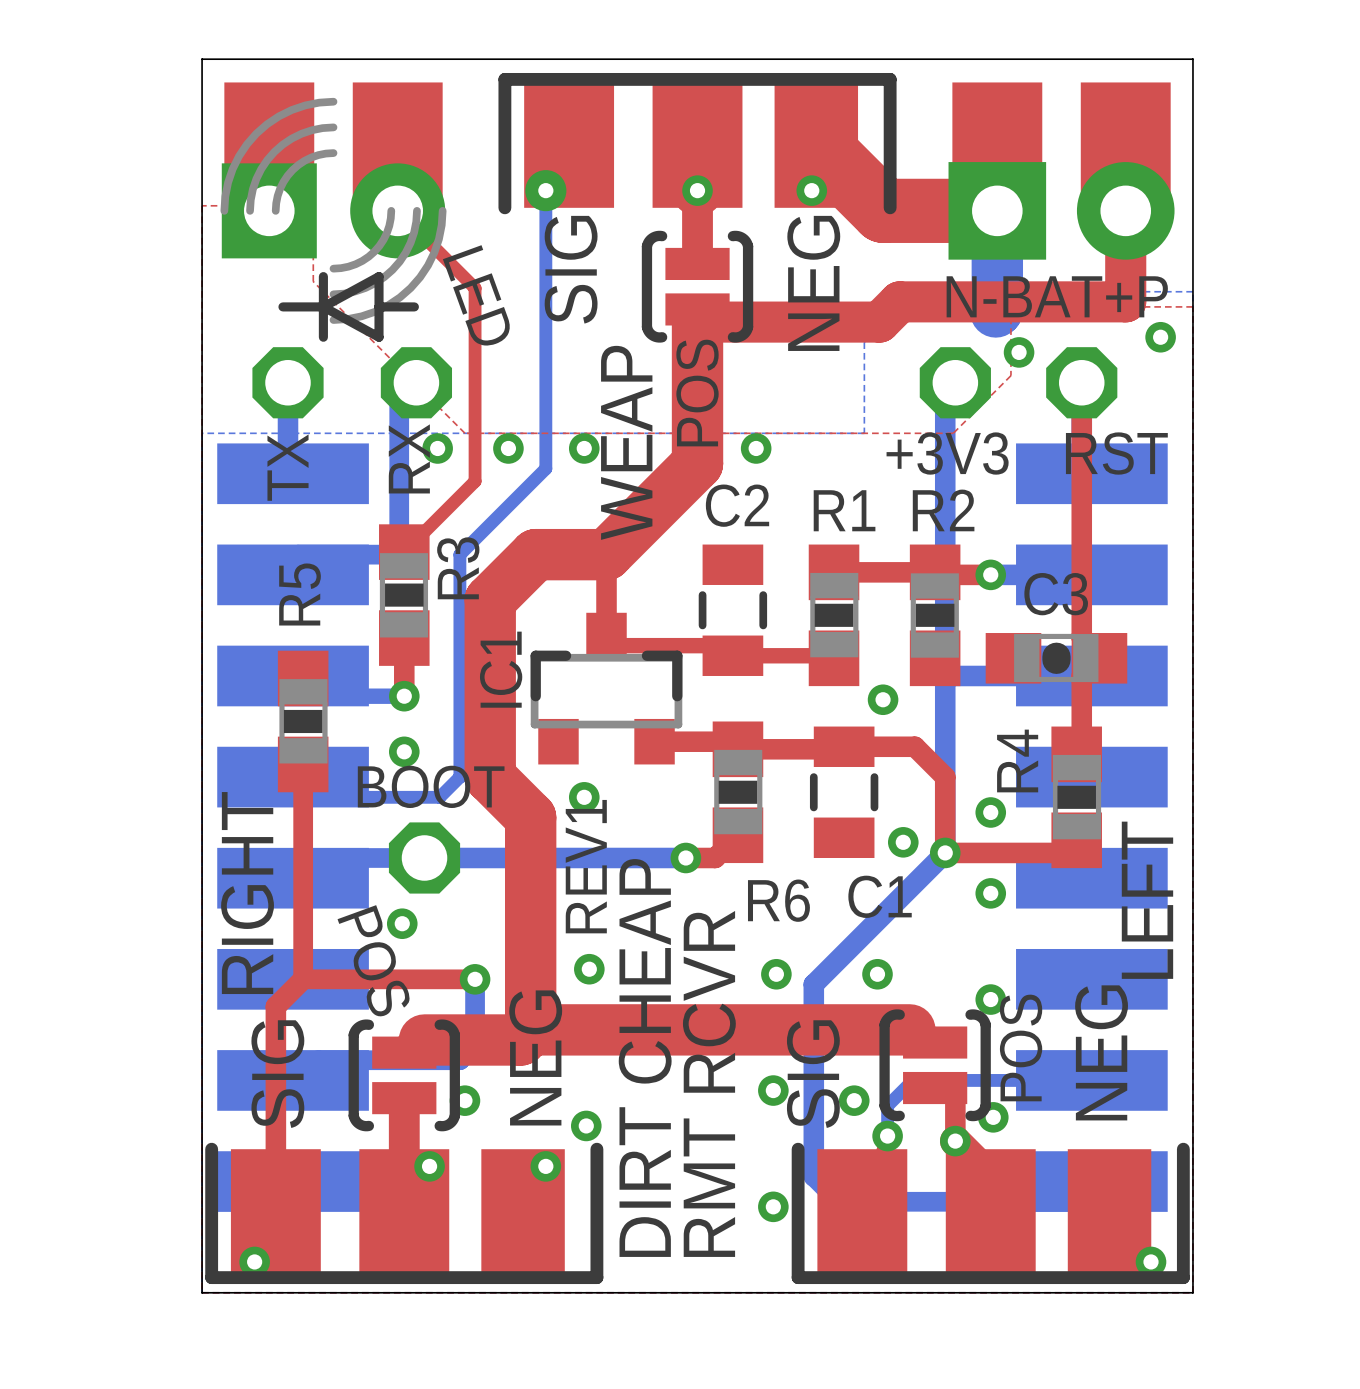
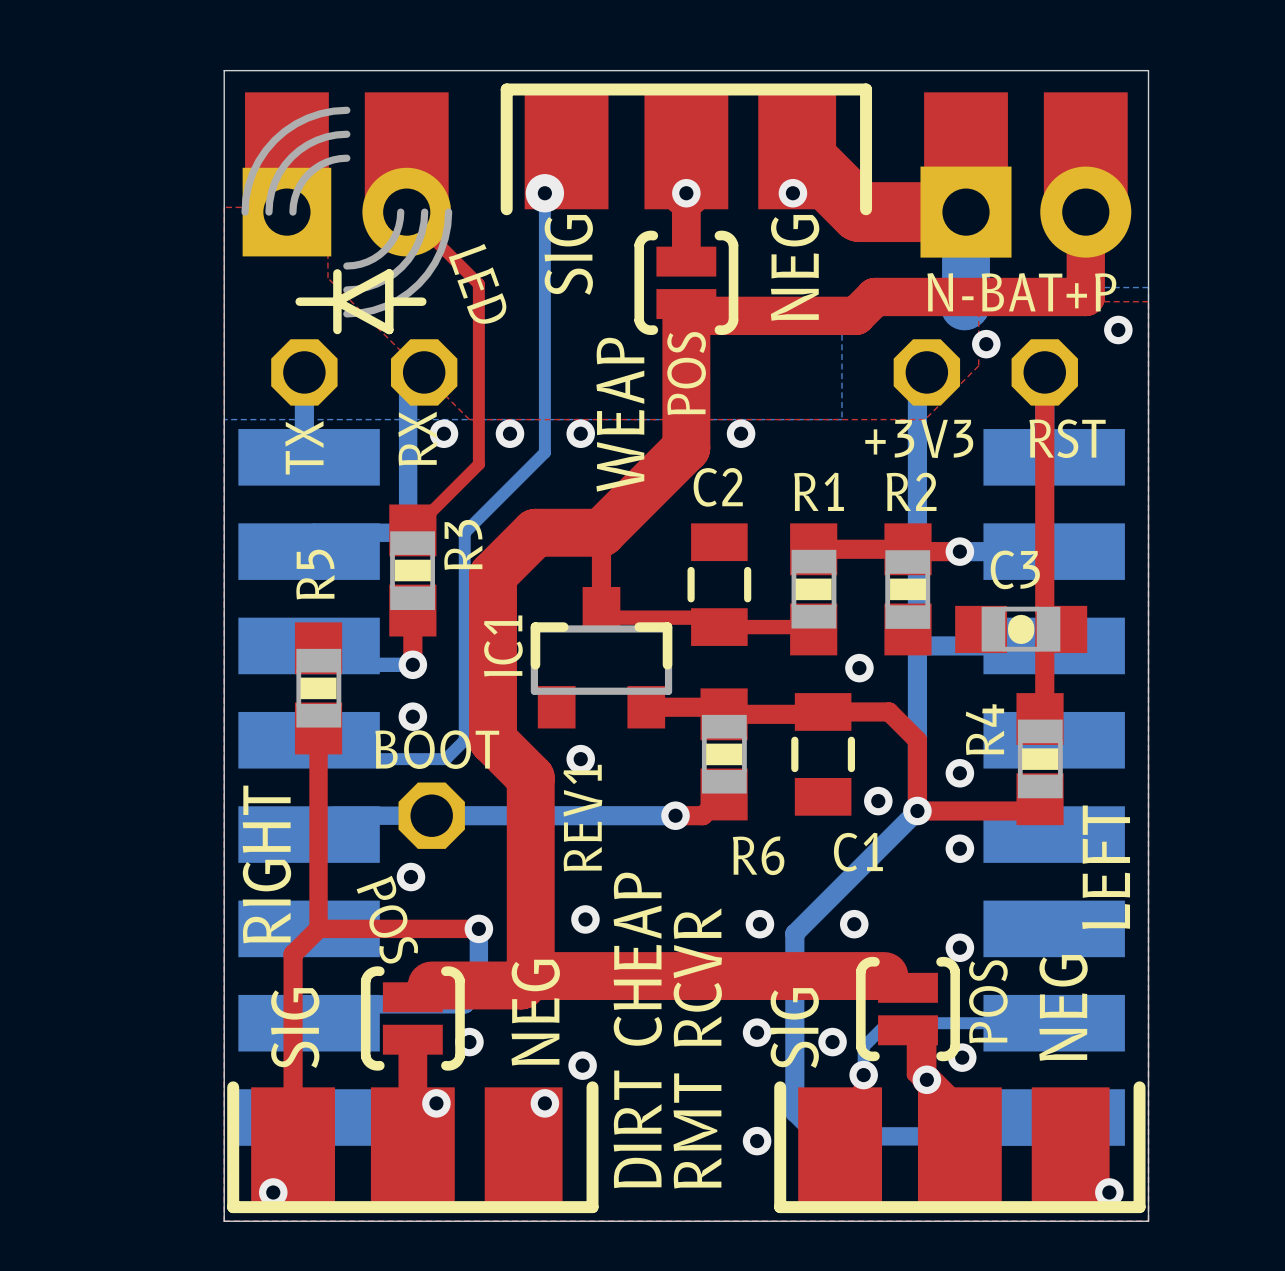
top track: none -> (912, 1037) (912, 1075) (917, 1079) (926, 1079)

